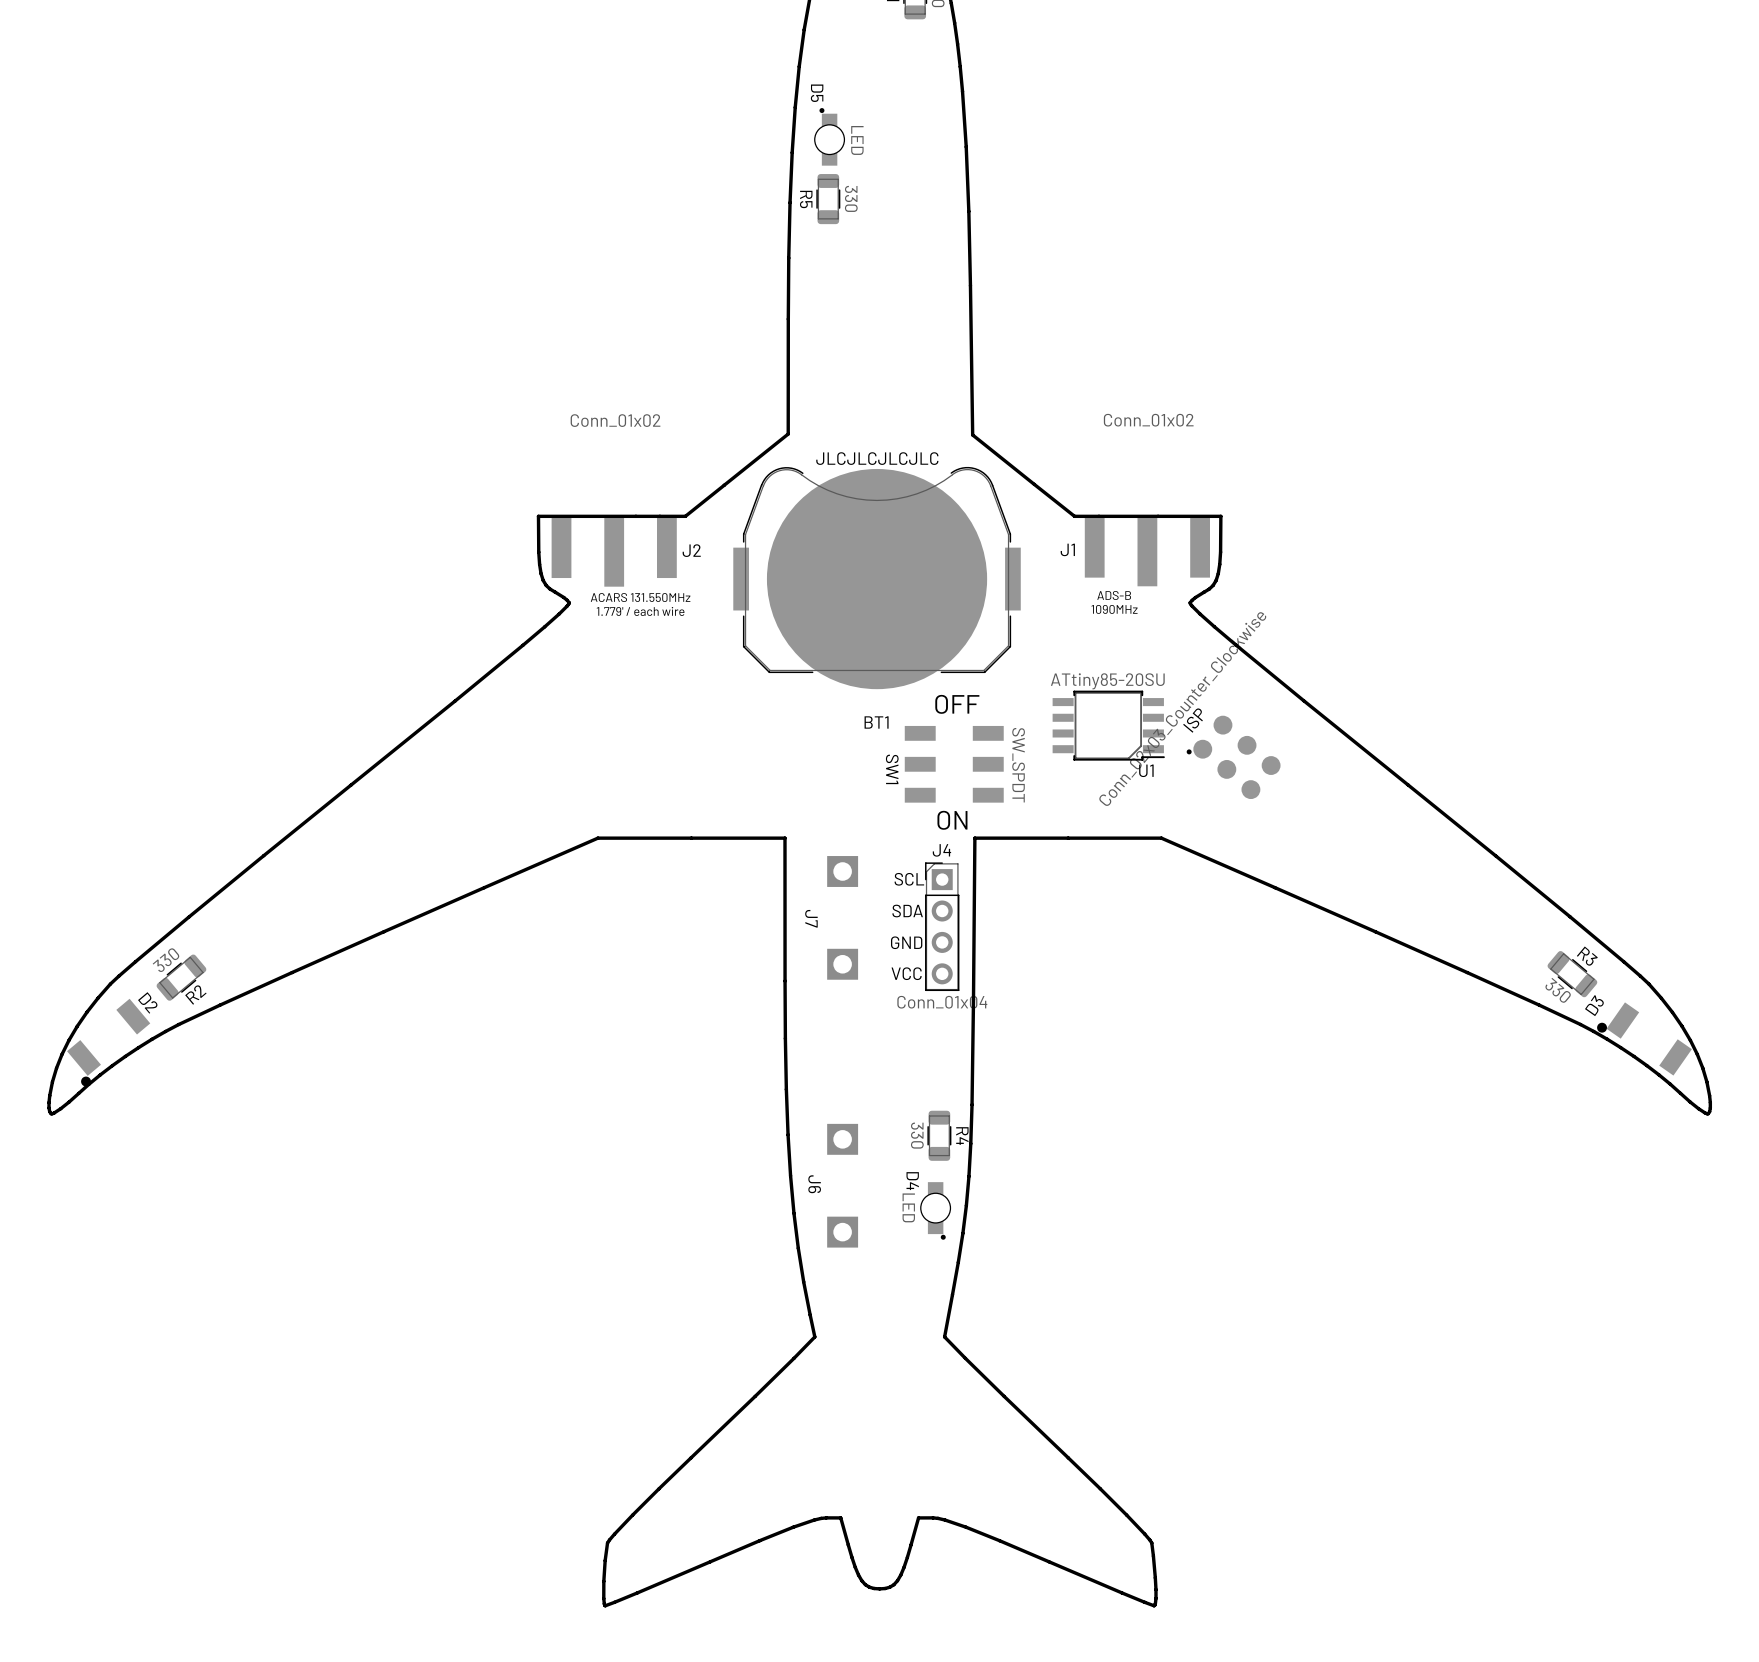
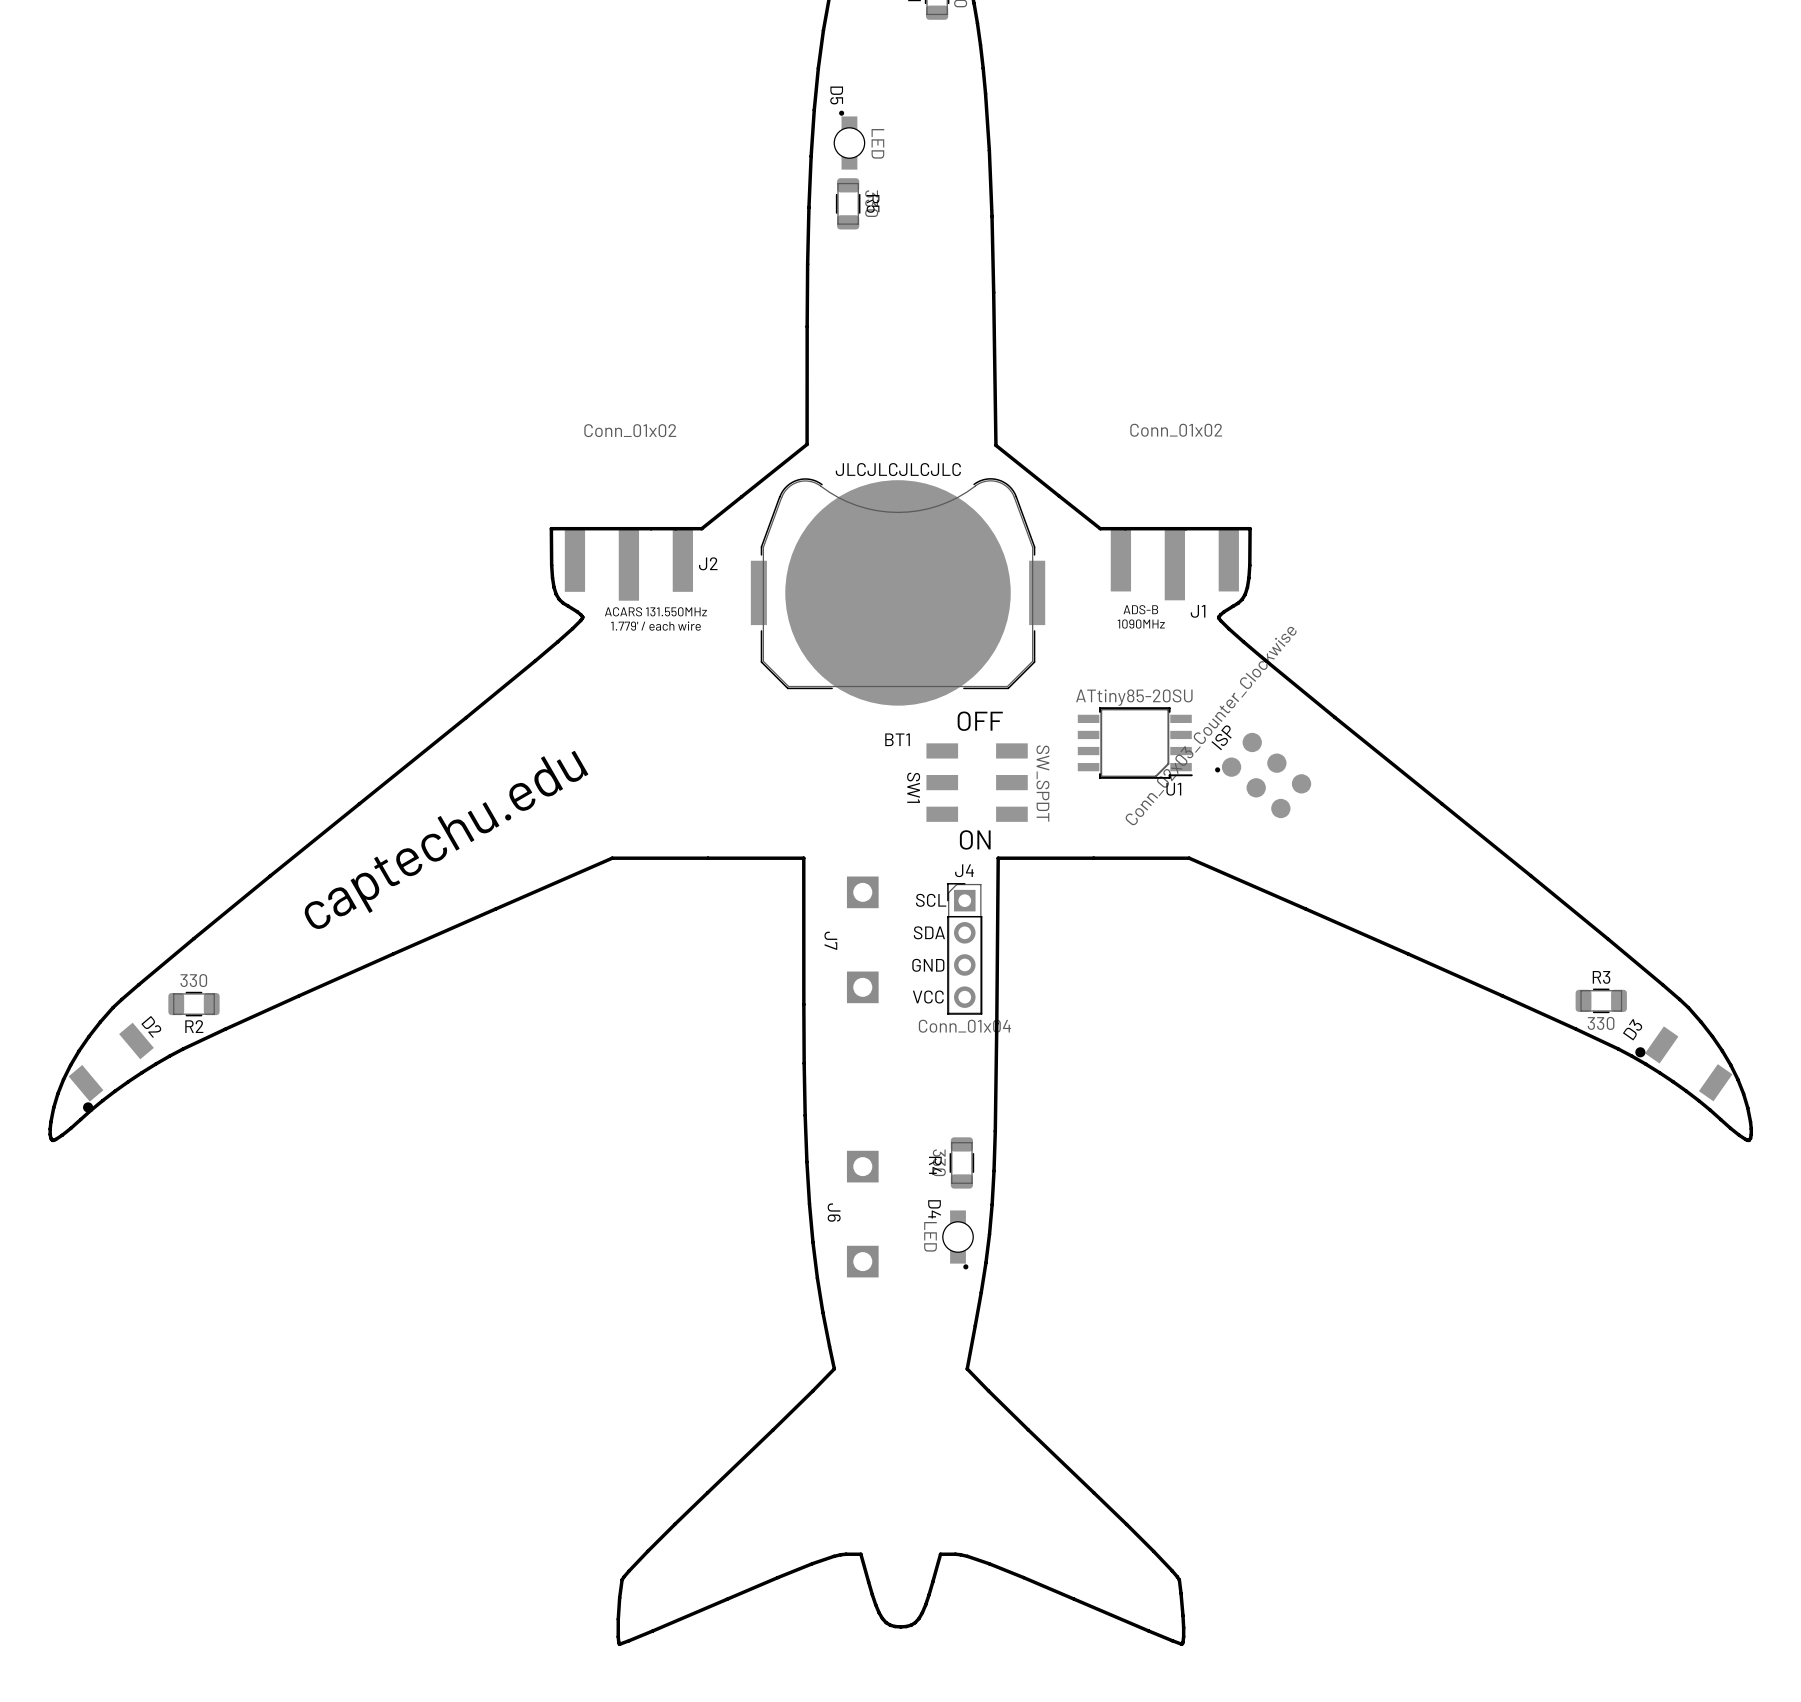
R5 name position: R5 (806, 199) -> R5 (873, 203)
J1 name position: J1 (1067, 549) -> J1 (1198, 611)
text: none -> captechu.edu (446, 839)
R3 footprint: [1547, 951, 1598, 998] -> [1575, 988, 1627, 1014]
R2 footprint: [156, 954, 207, 1001] -> [168, 991, 220, 1017]
R4 name position: R4 (962, 1136) -> R4 (935, 1165)

